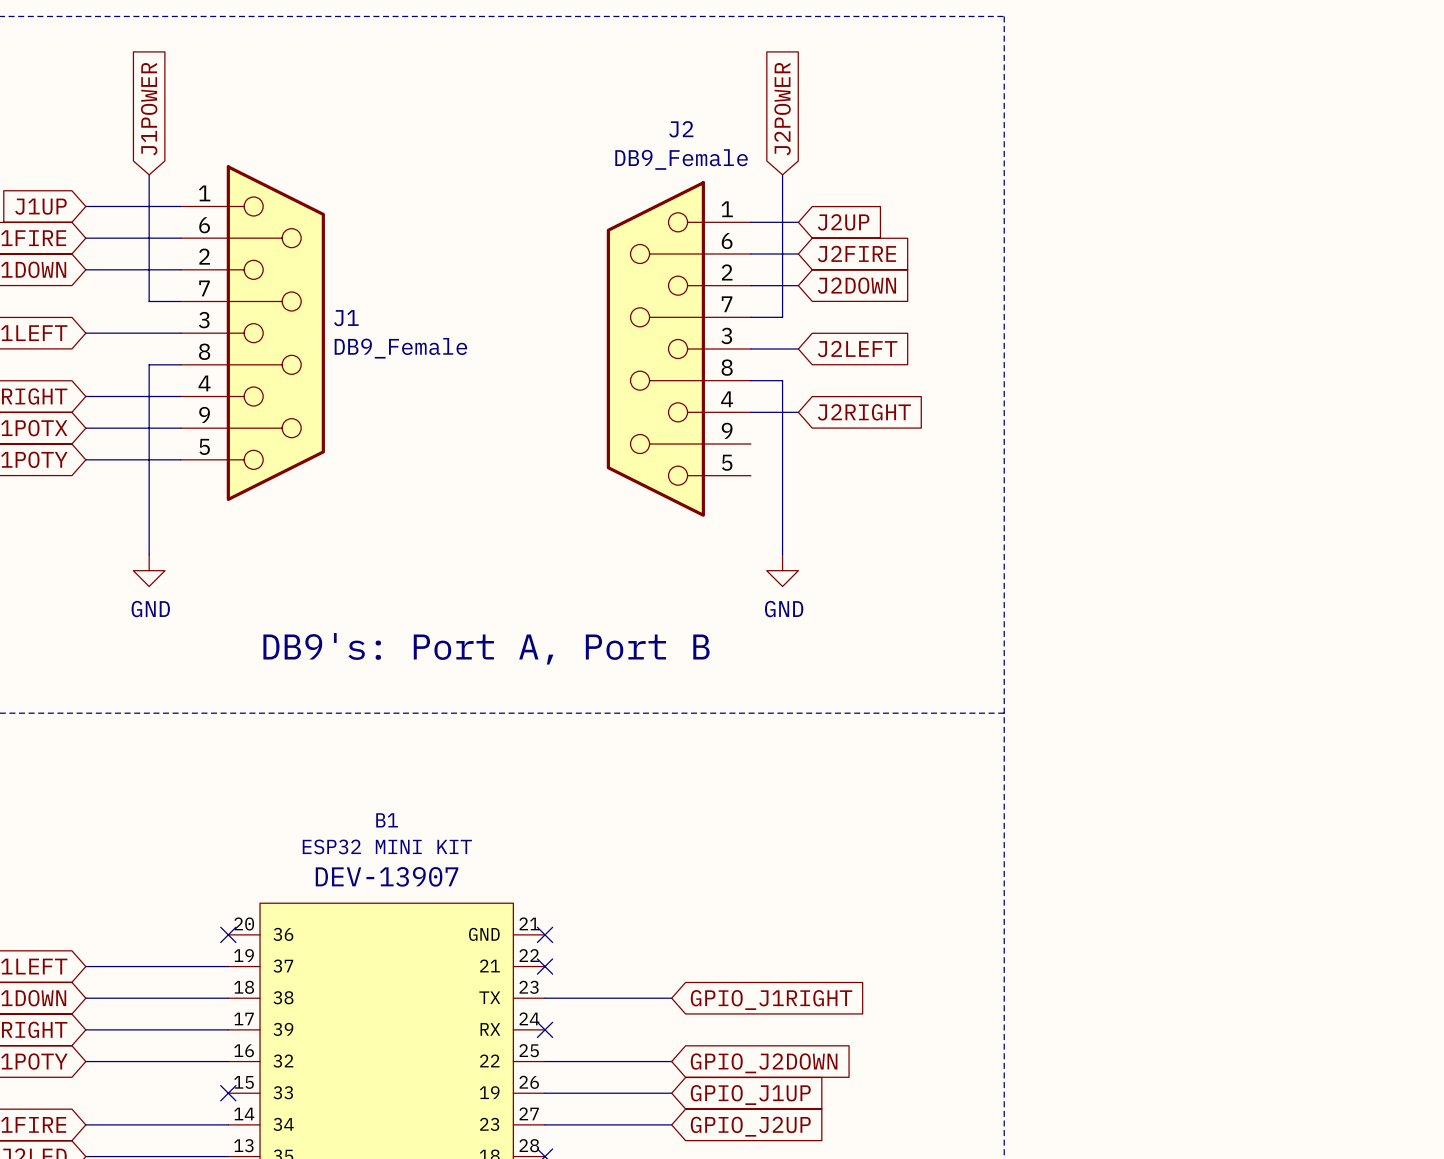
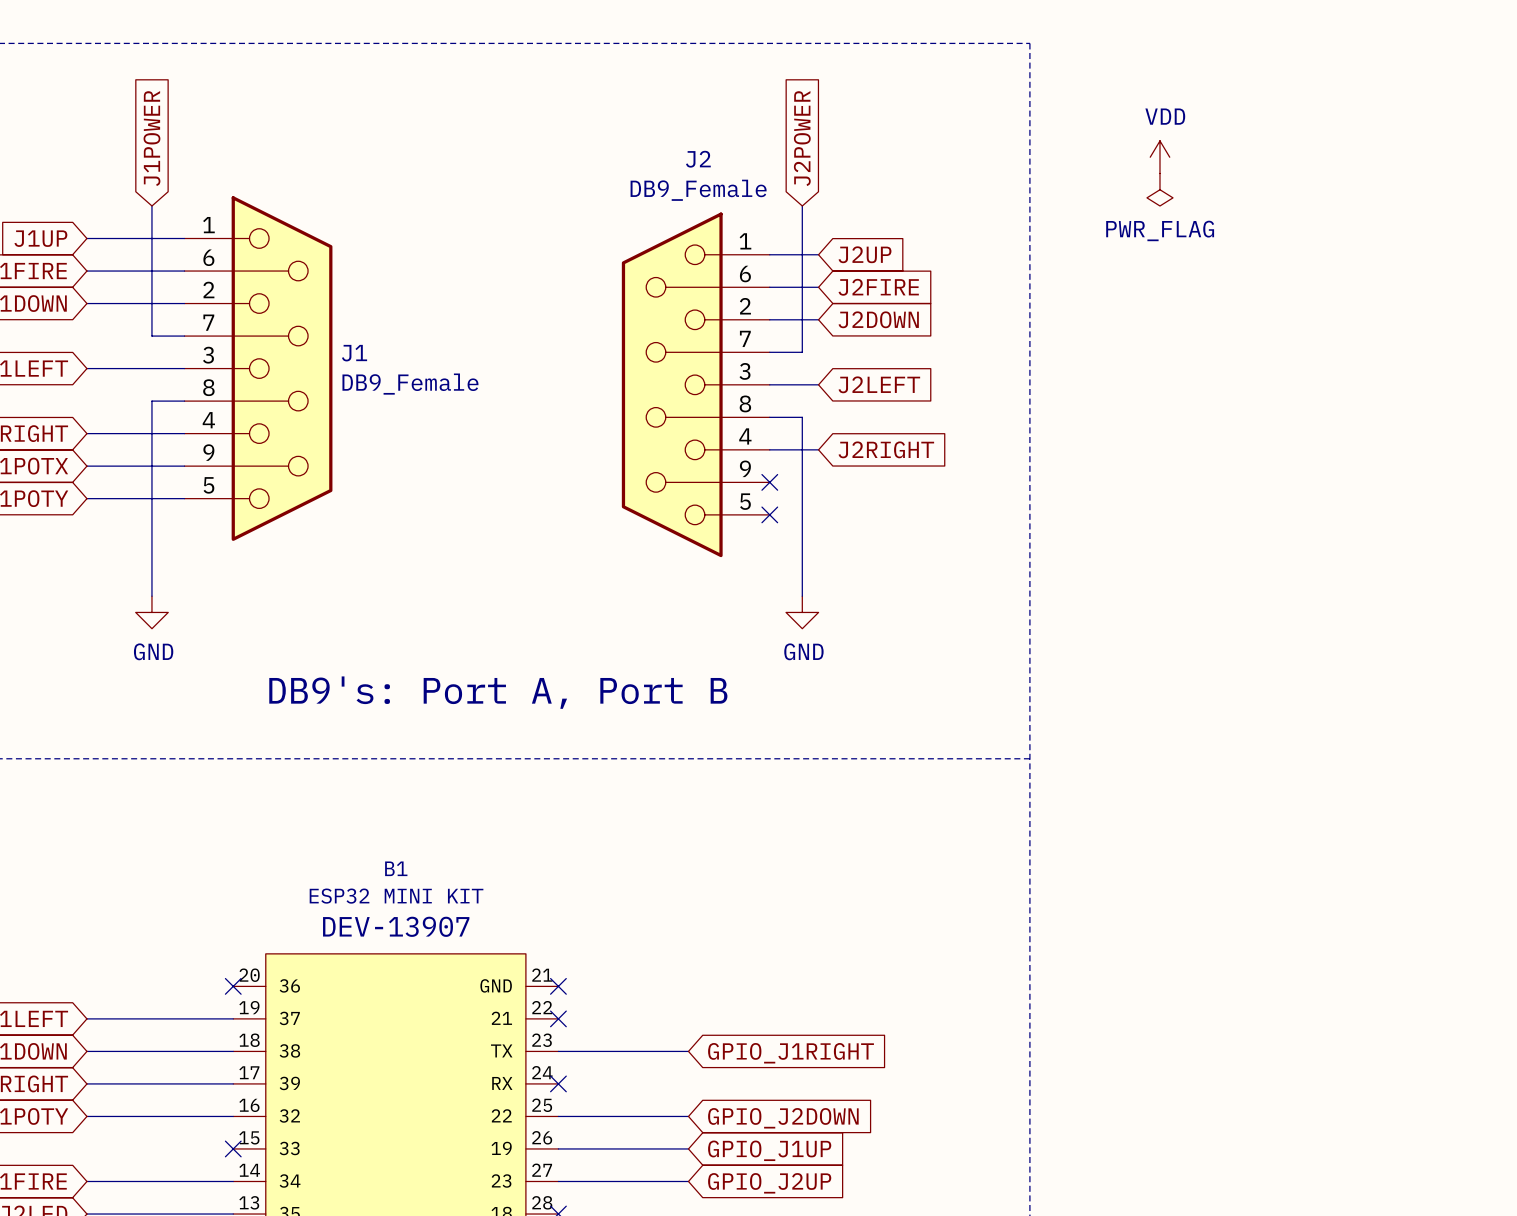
power symbol: none -> VDD (1159, 157)
power symbol: none -> PWR_FLAG (1159, 189)
no-connect mark: none -> (769, 482)
no-connect mark: none -> (769, 514)

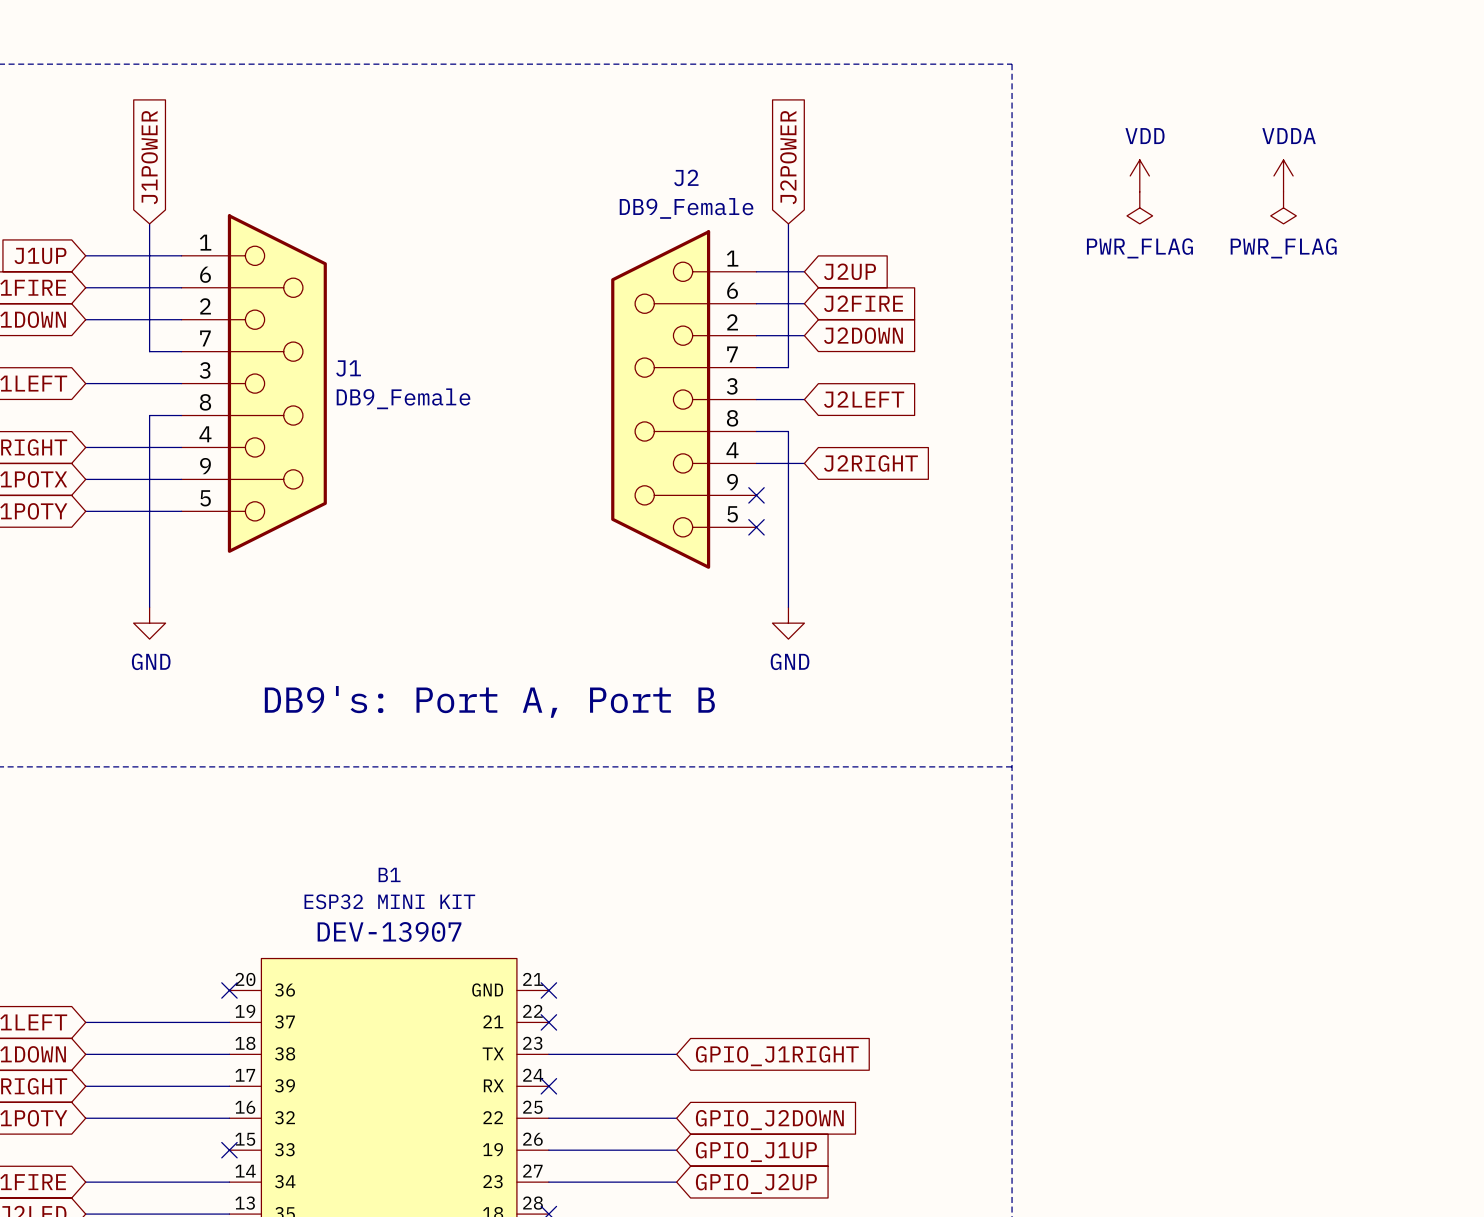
power symbol: none -> VDDA (1283, 175)
power symbol: none -> PWR_FLAG (1283, 207)

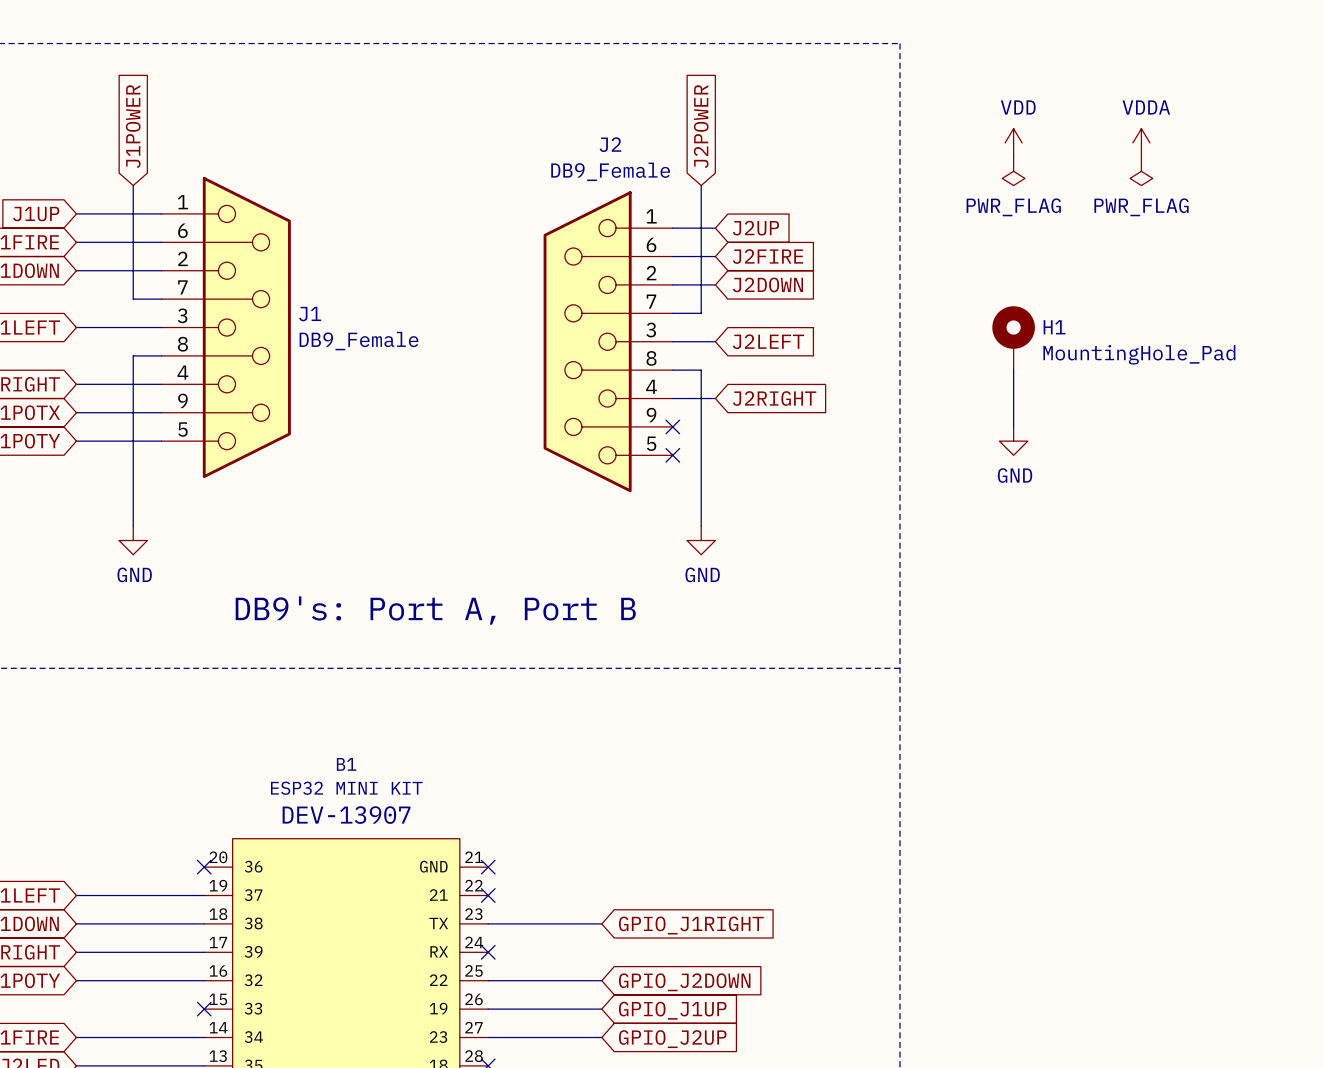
H1: none -> MountingHole_Pad (1013, 338)
wire: none -> (1013, 370) (1013, 426)
power symbol: none -> GND (1013, 441)

